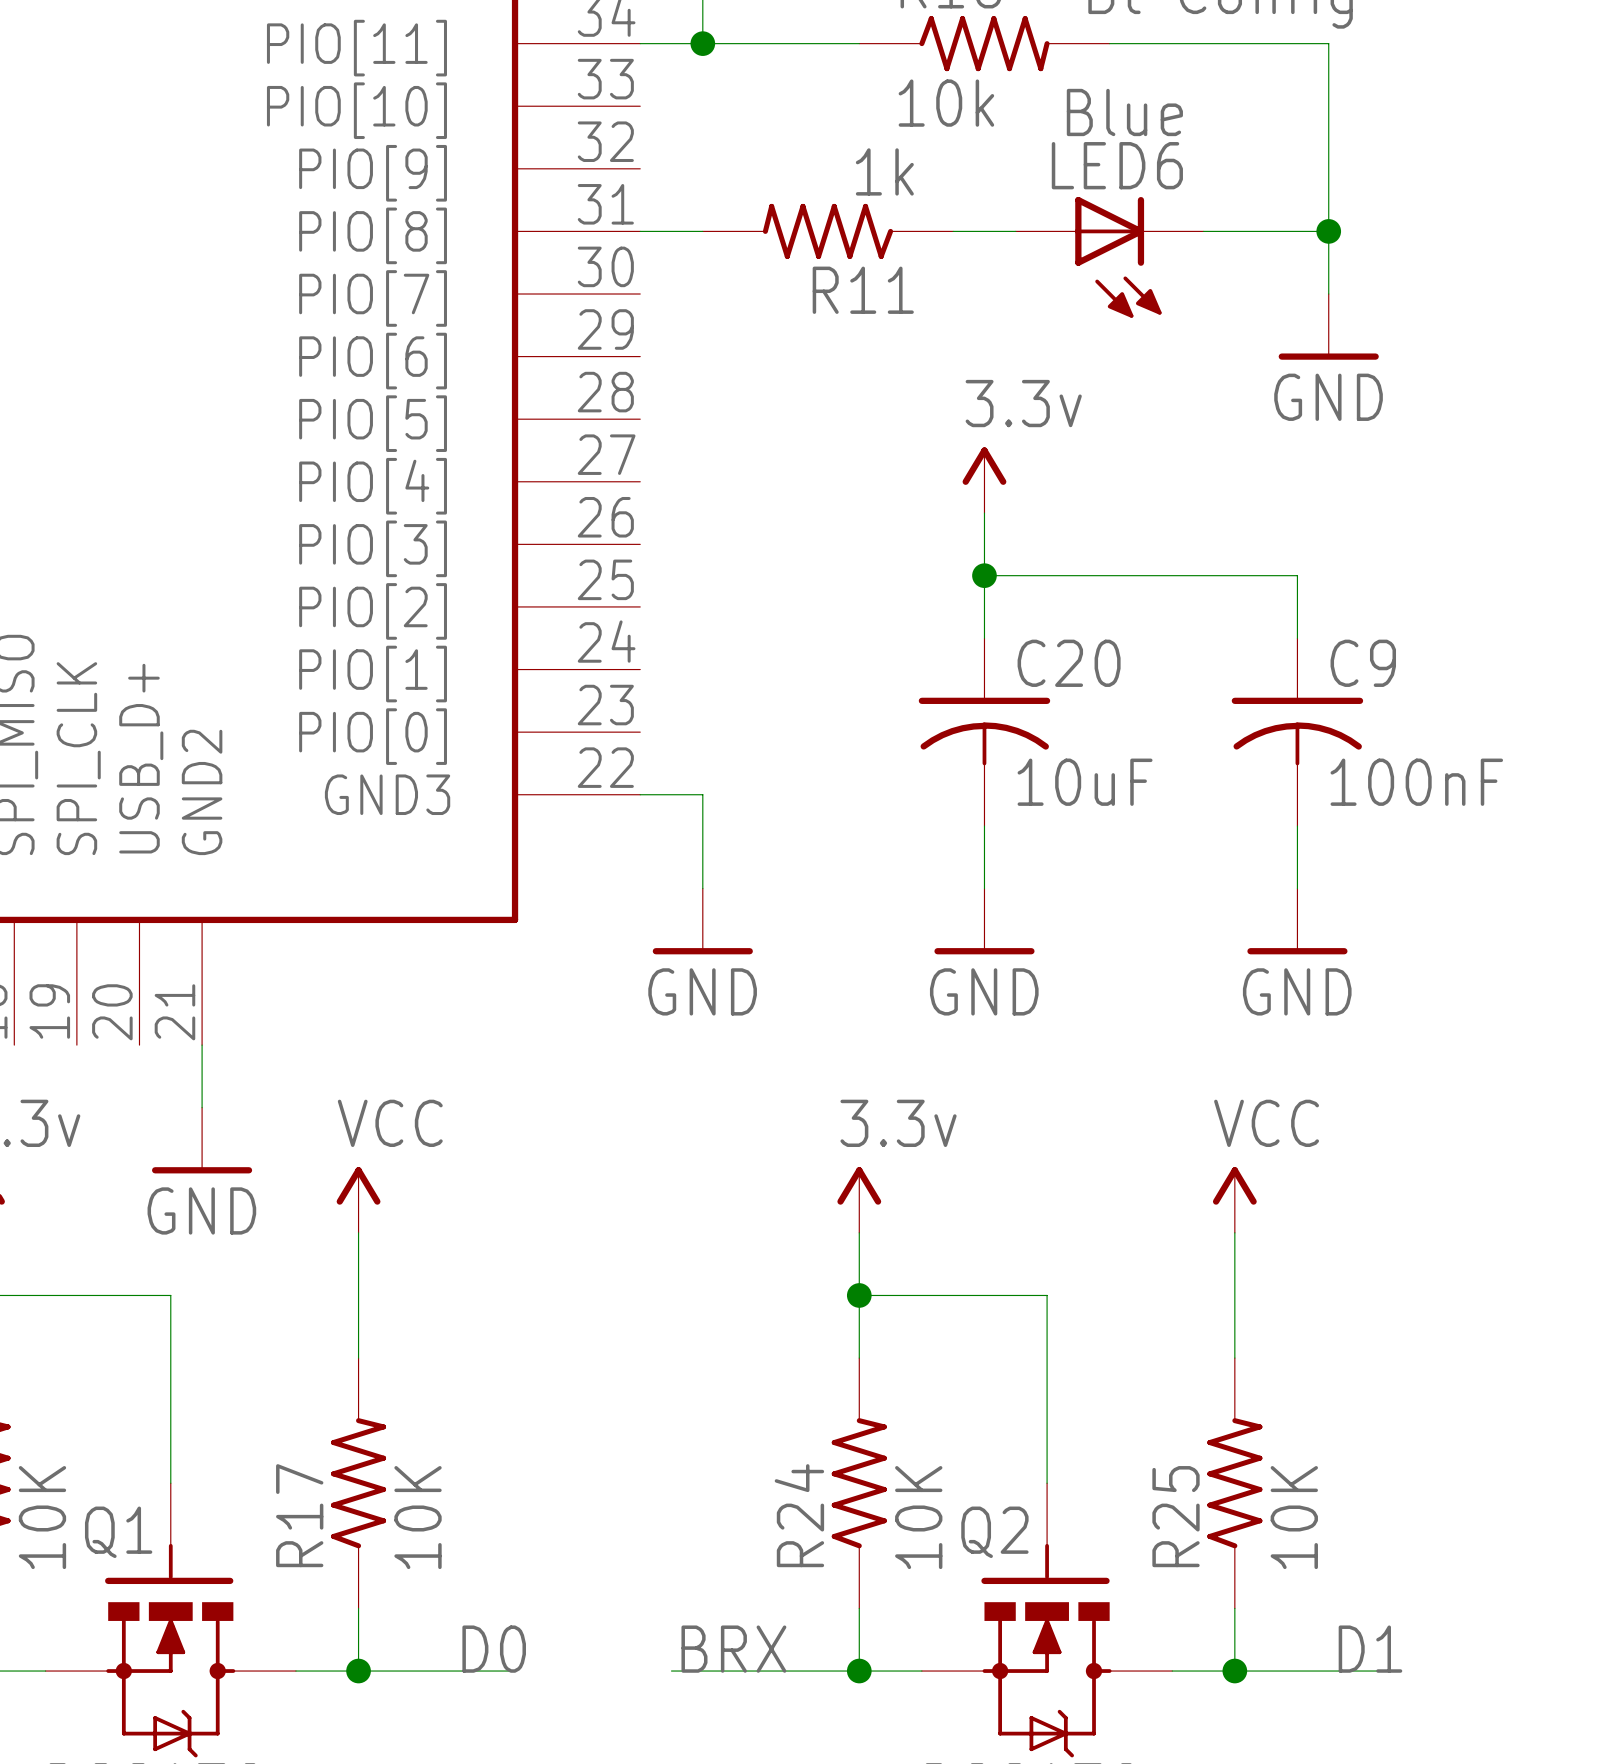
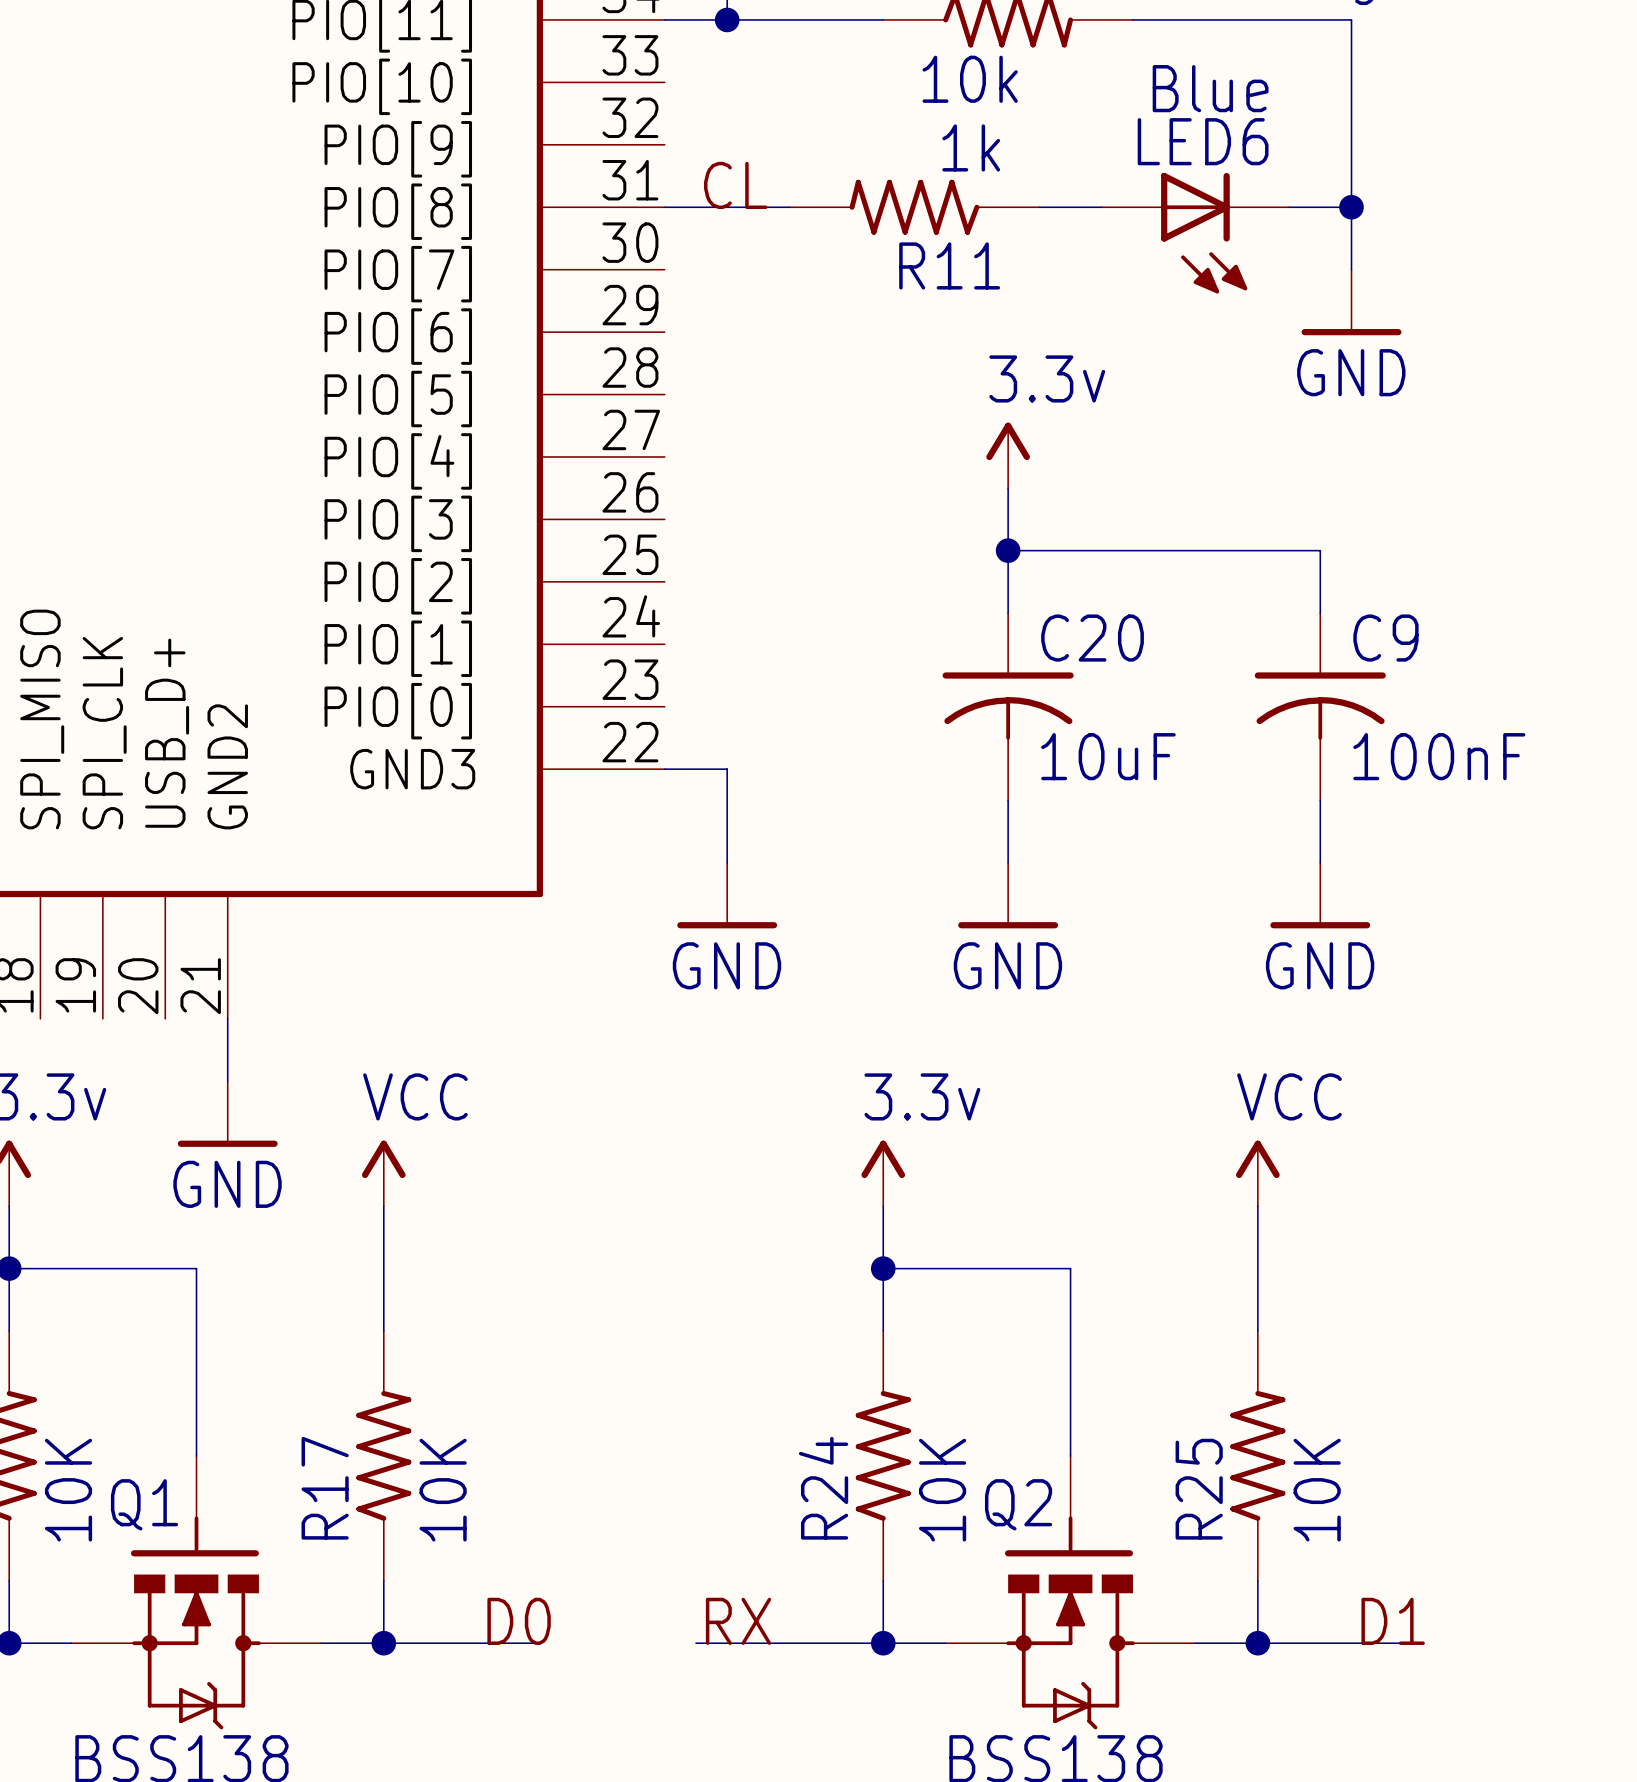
label: none -> CL (735, 185)
R11 position: (827, 231) -> (914, 207)
LED6 position: (1109, 257) -> (1195, 233)
label: BRX (733, 1649) -> RX (738, 1621)

